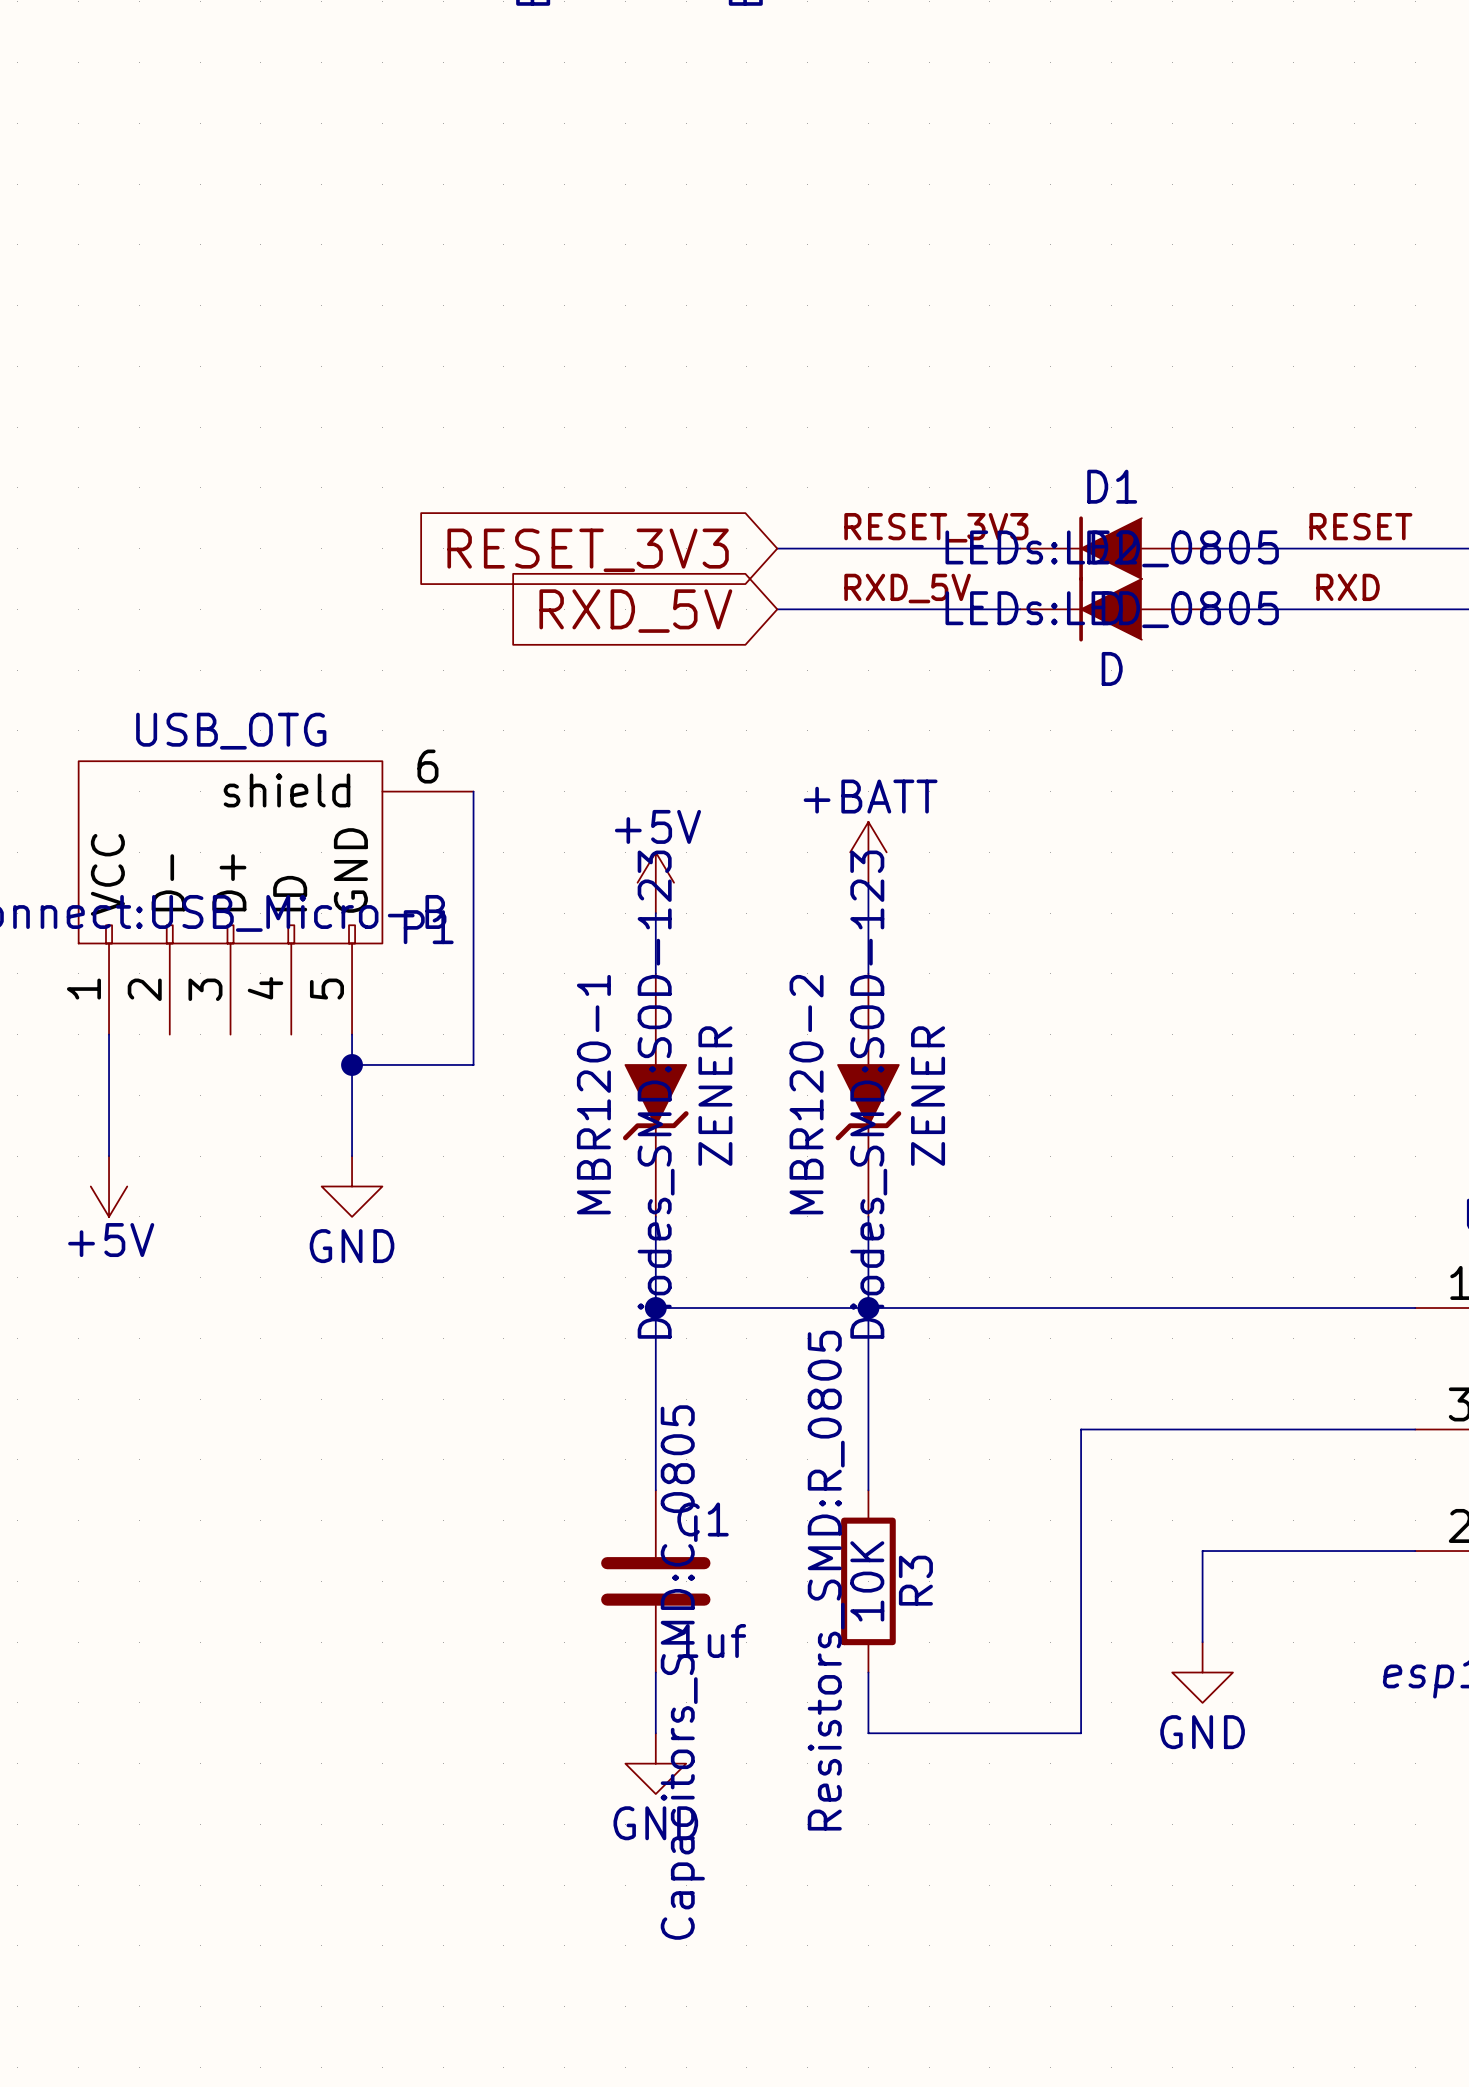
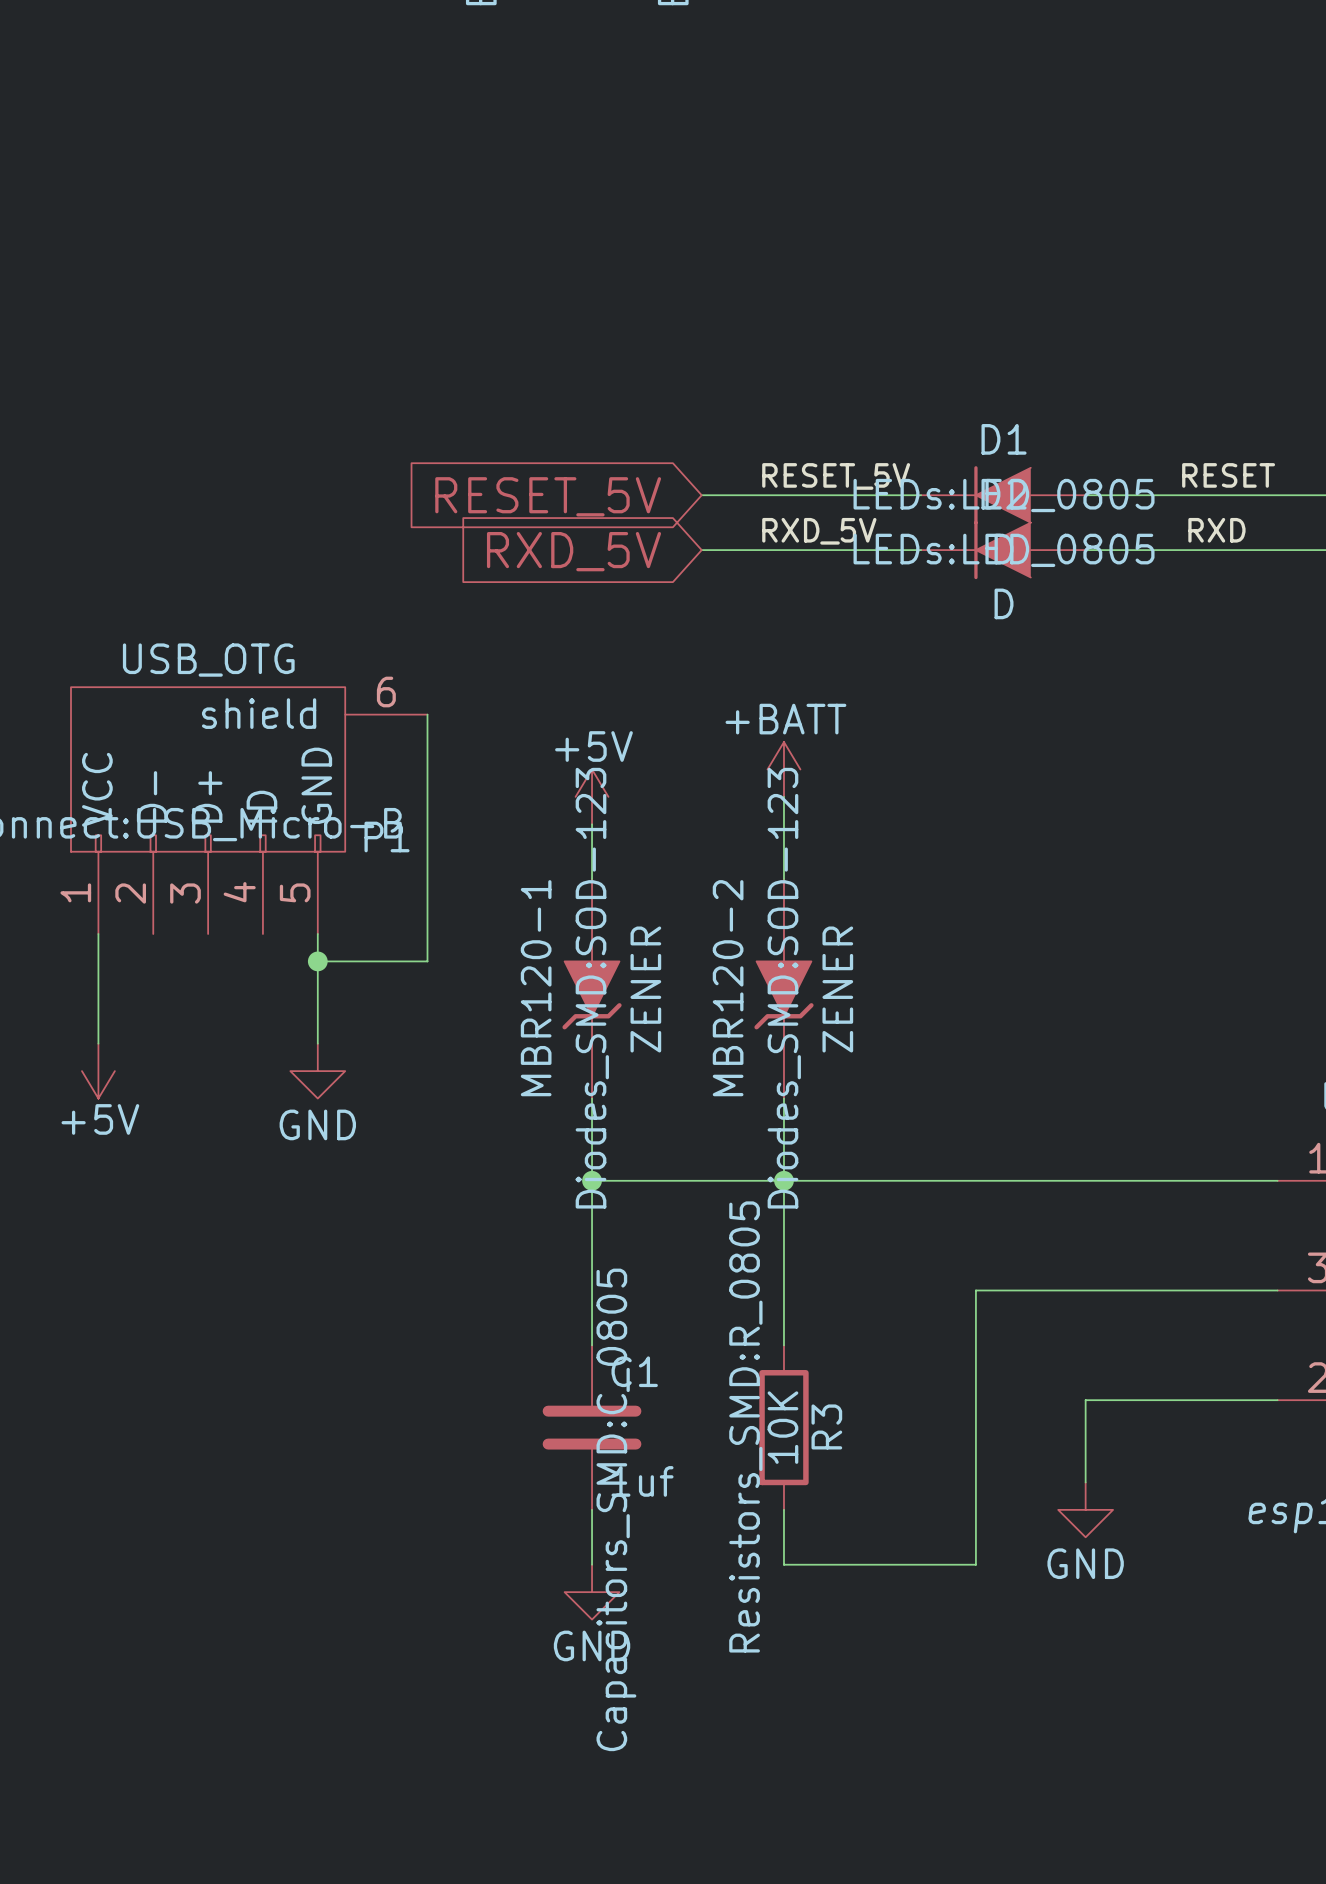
label: RESET_3V3 (936, 527) -> RESET_5V (836, 476)
global label: RESET_3V3 (588, 550) -> RESET_5V (548, 496)

